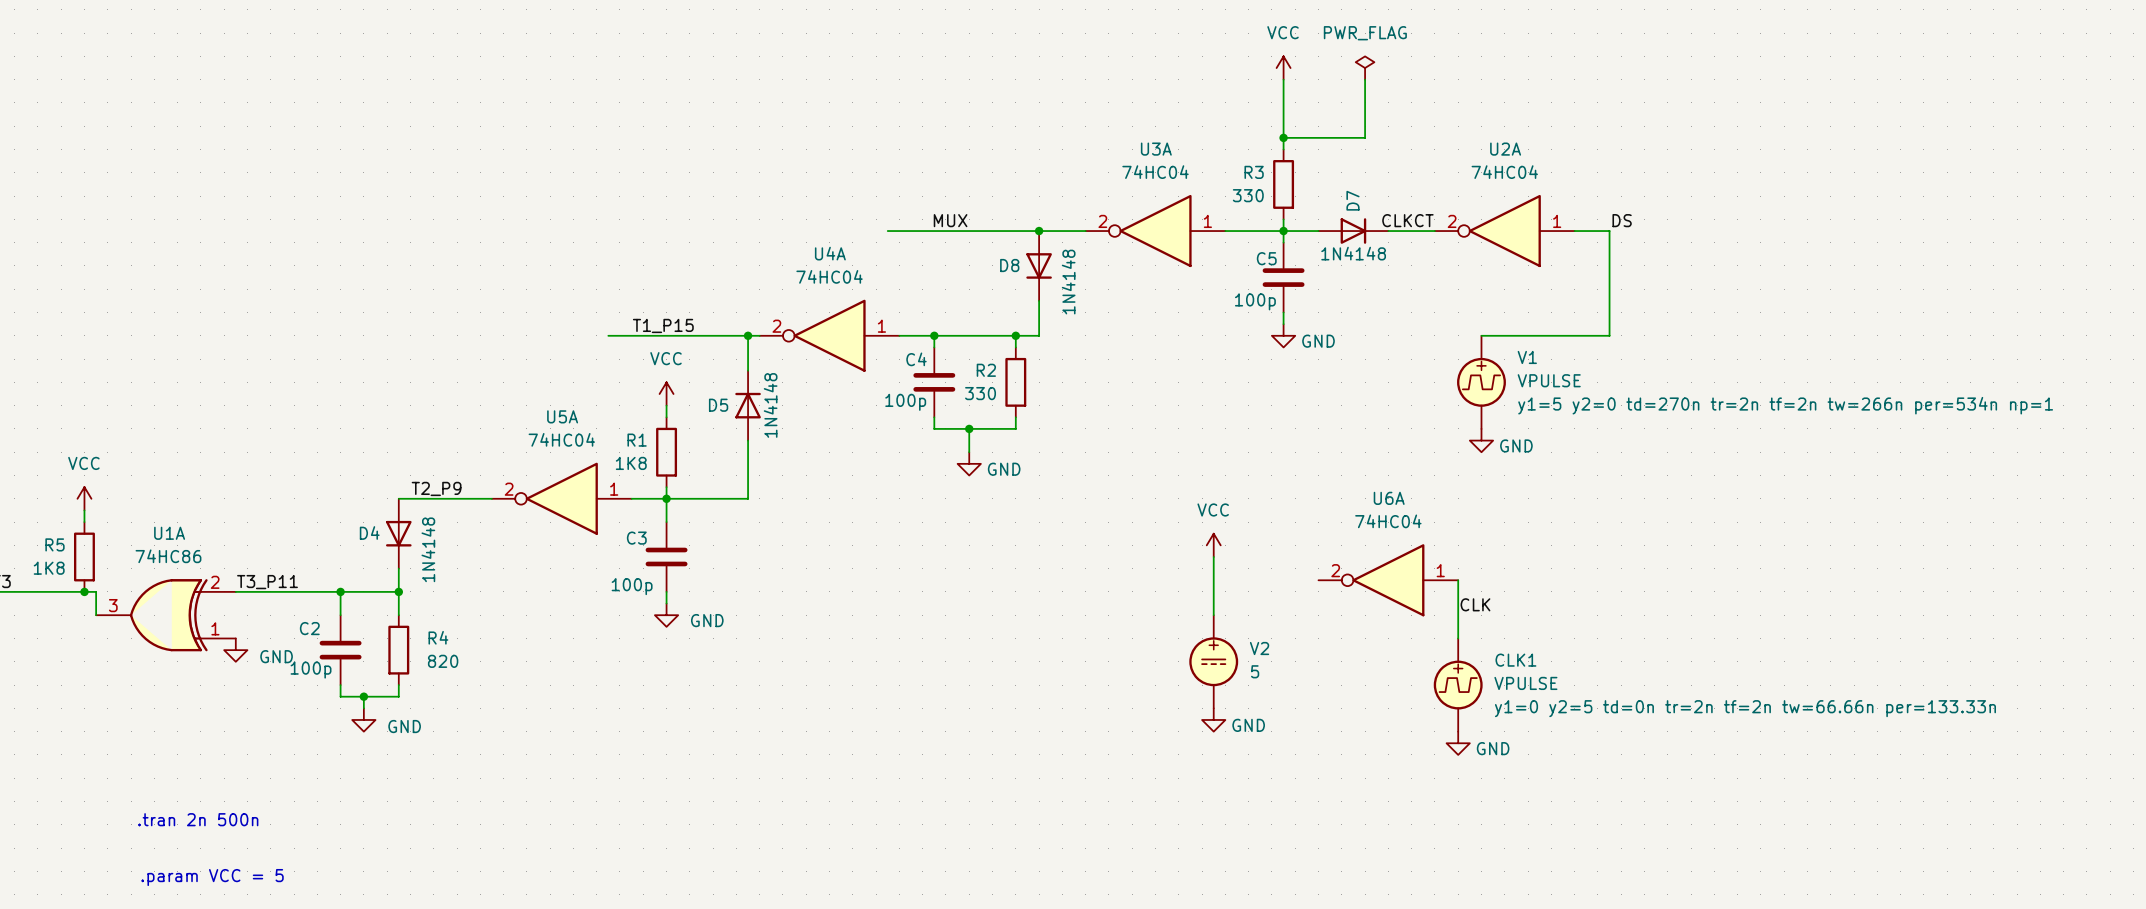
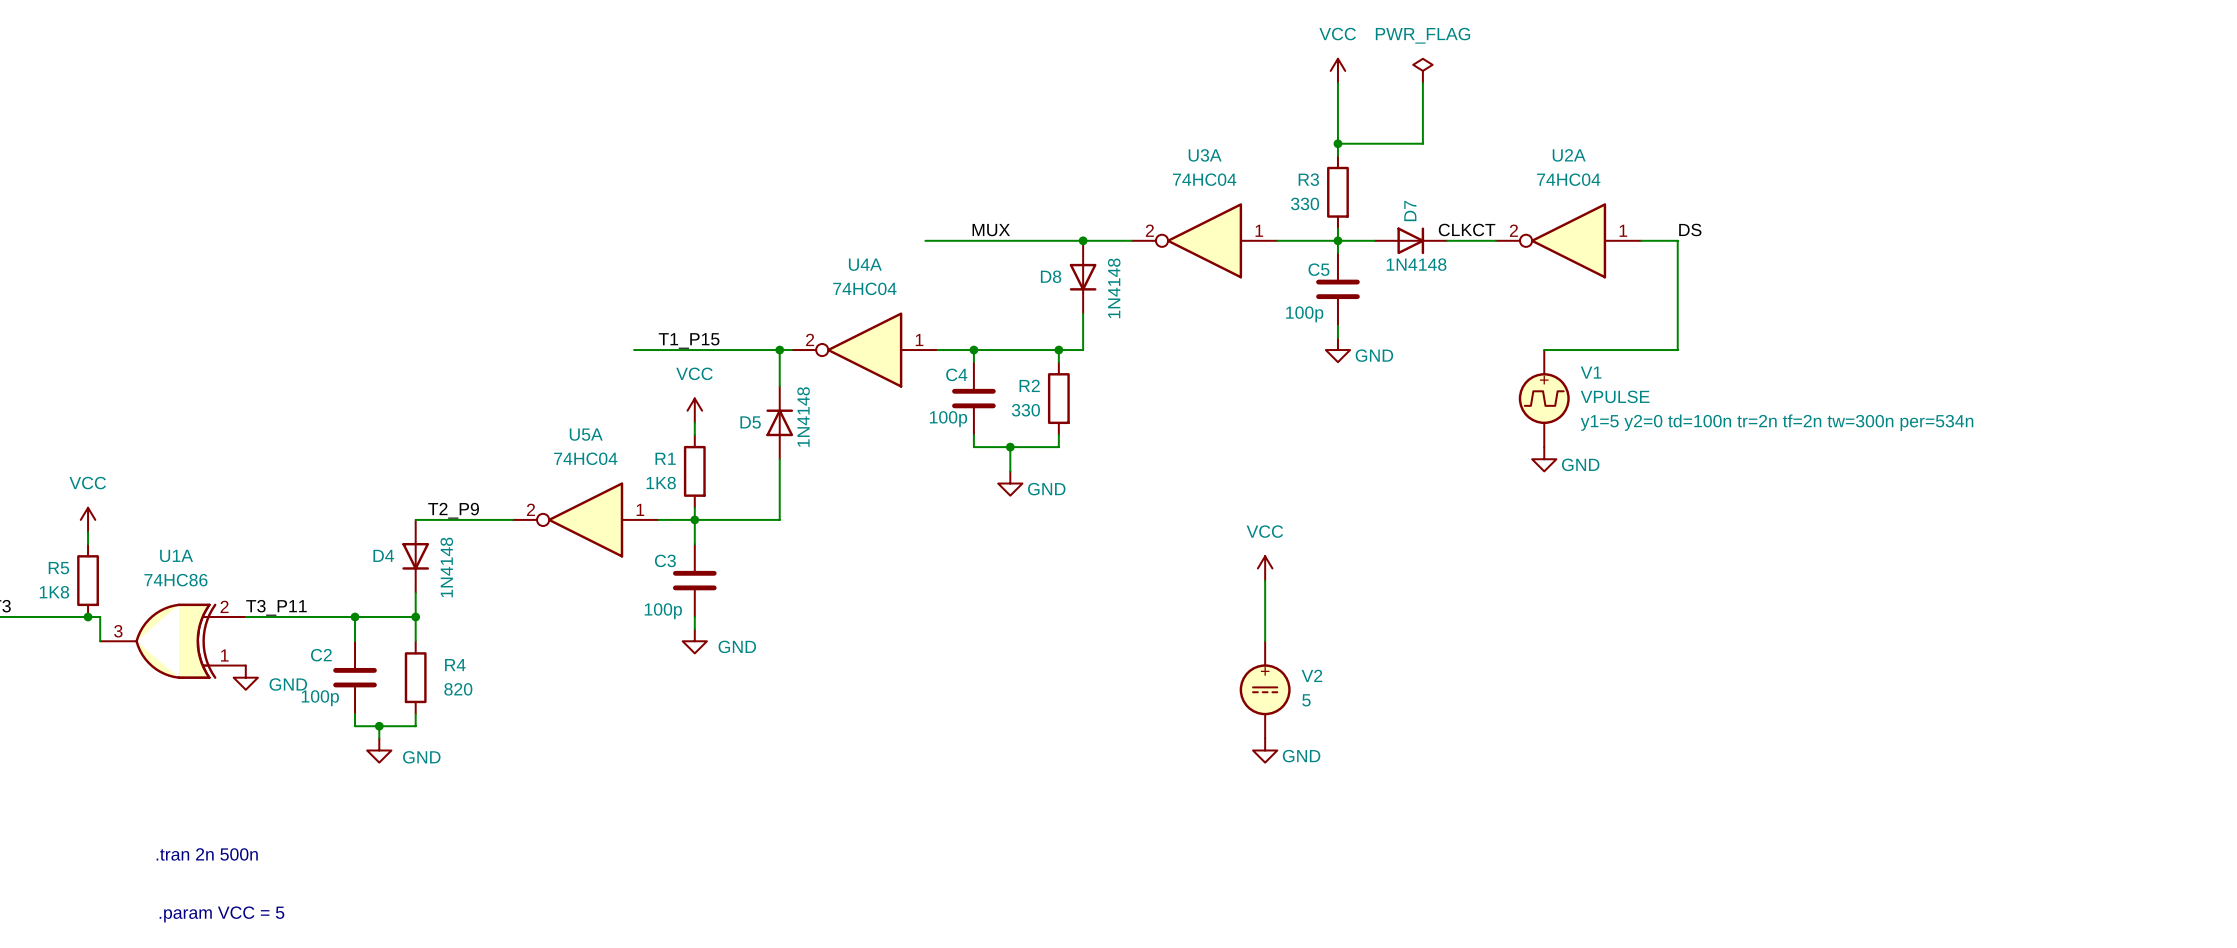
V1 text: y1=5 y2=0 td=270n tr=2n tf=2n tw=266n per=534n np=1 (1785, 405) -> y1=5 y2=0 td=100n tr=2n tf=2n tw=300n per=534n (1777, 422)
U6A: 74HC04 (1388, 580) -> none
wire: (1458, 580) (1458, 638) -> none
label: CLK (1475, 604) -> none
CLK1: VPULSE (1458, 685) -> none
power symbol: GND (1458, 743) -> none

